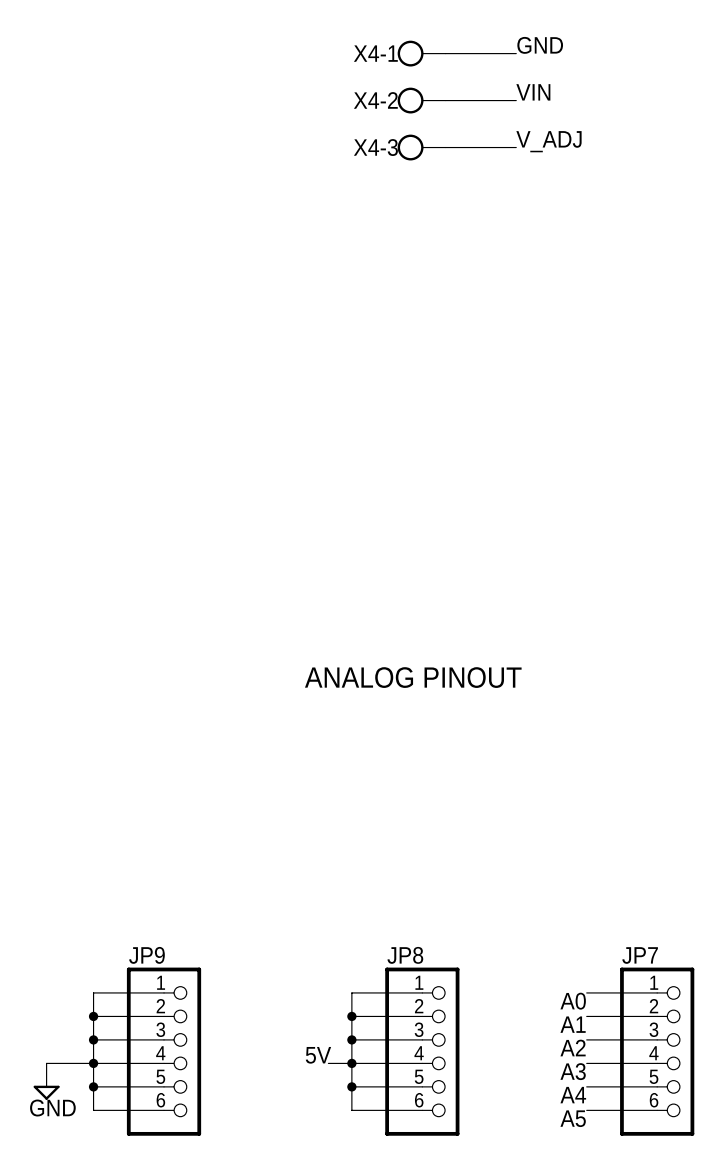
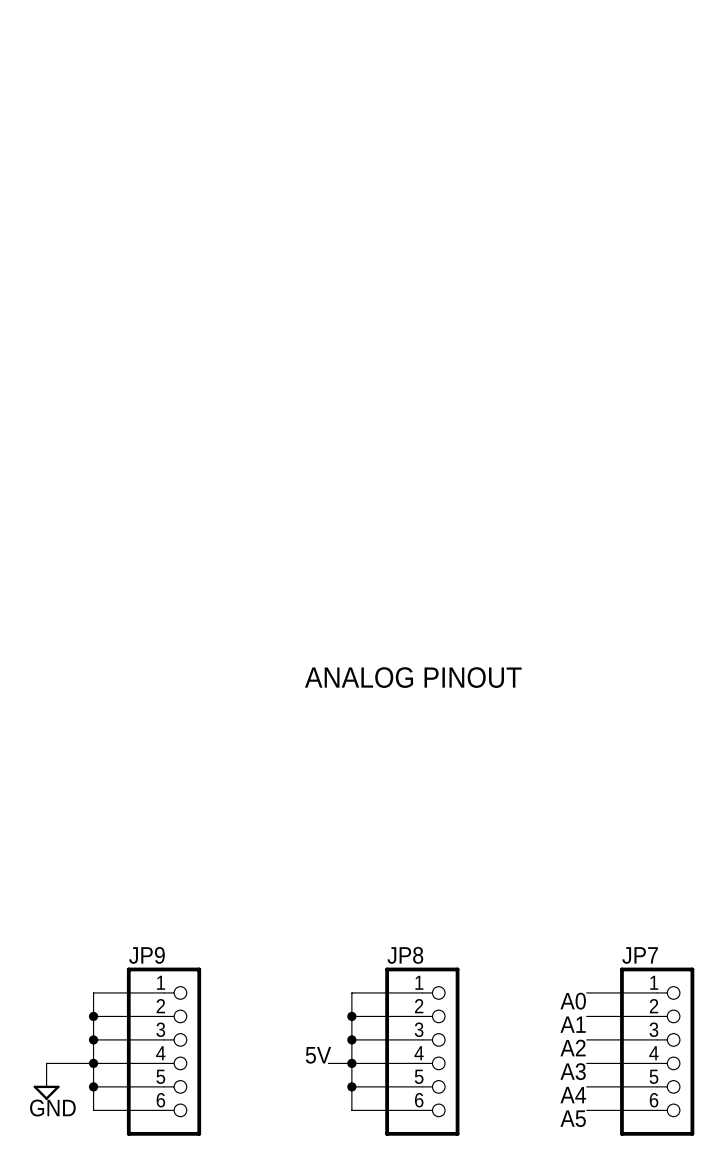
label: GND (540, 45) -> none
X4-1: (421, 53) -> none
wire: (445, 53) (516, 53) -> none
label: VIN (533, 92) -> none
X4-2: (421, 100) -> none
wire: (445, 100) (516, 100) -> none
label: V_ADJ (548, 141) -> none
X4-3: (421, 147) -> none
wire: (445, 147) (516, 147) -> none

